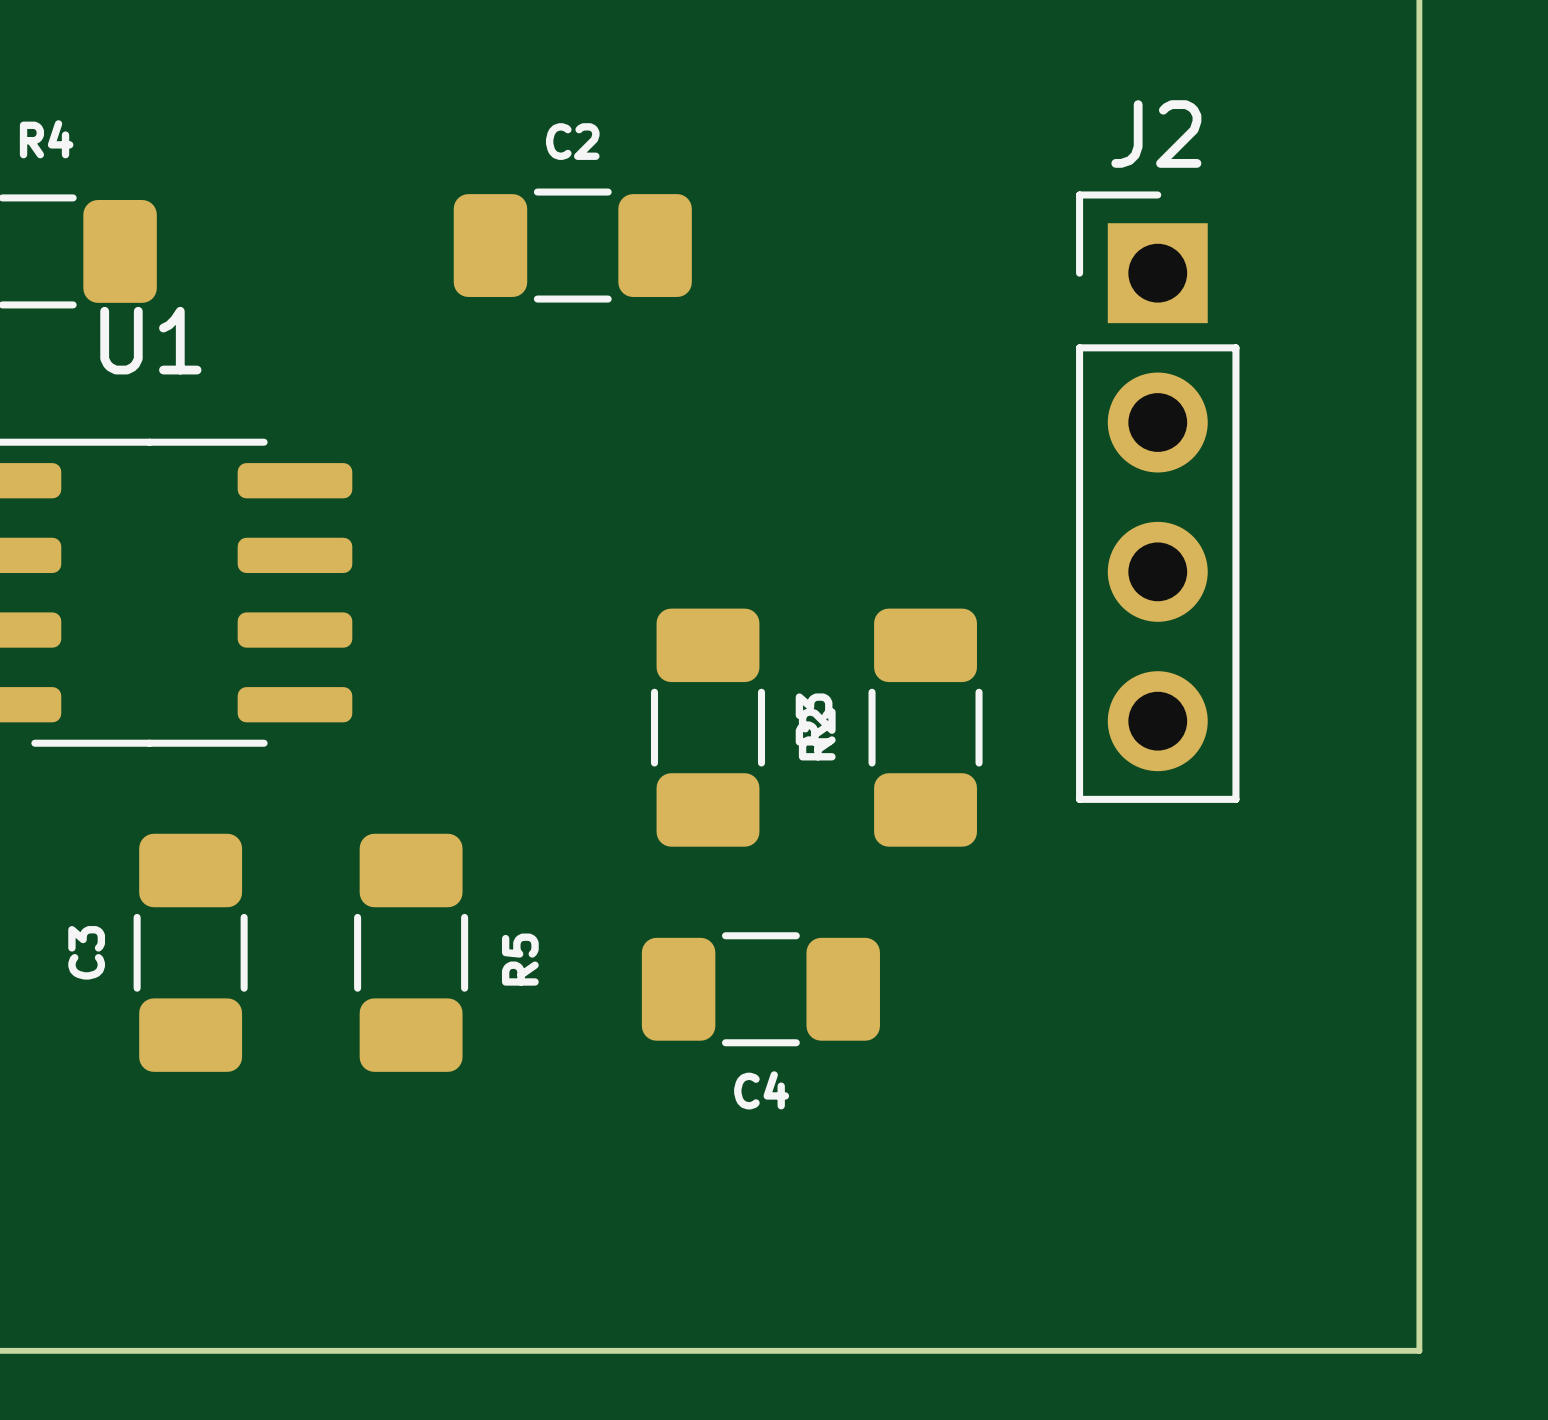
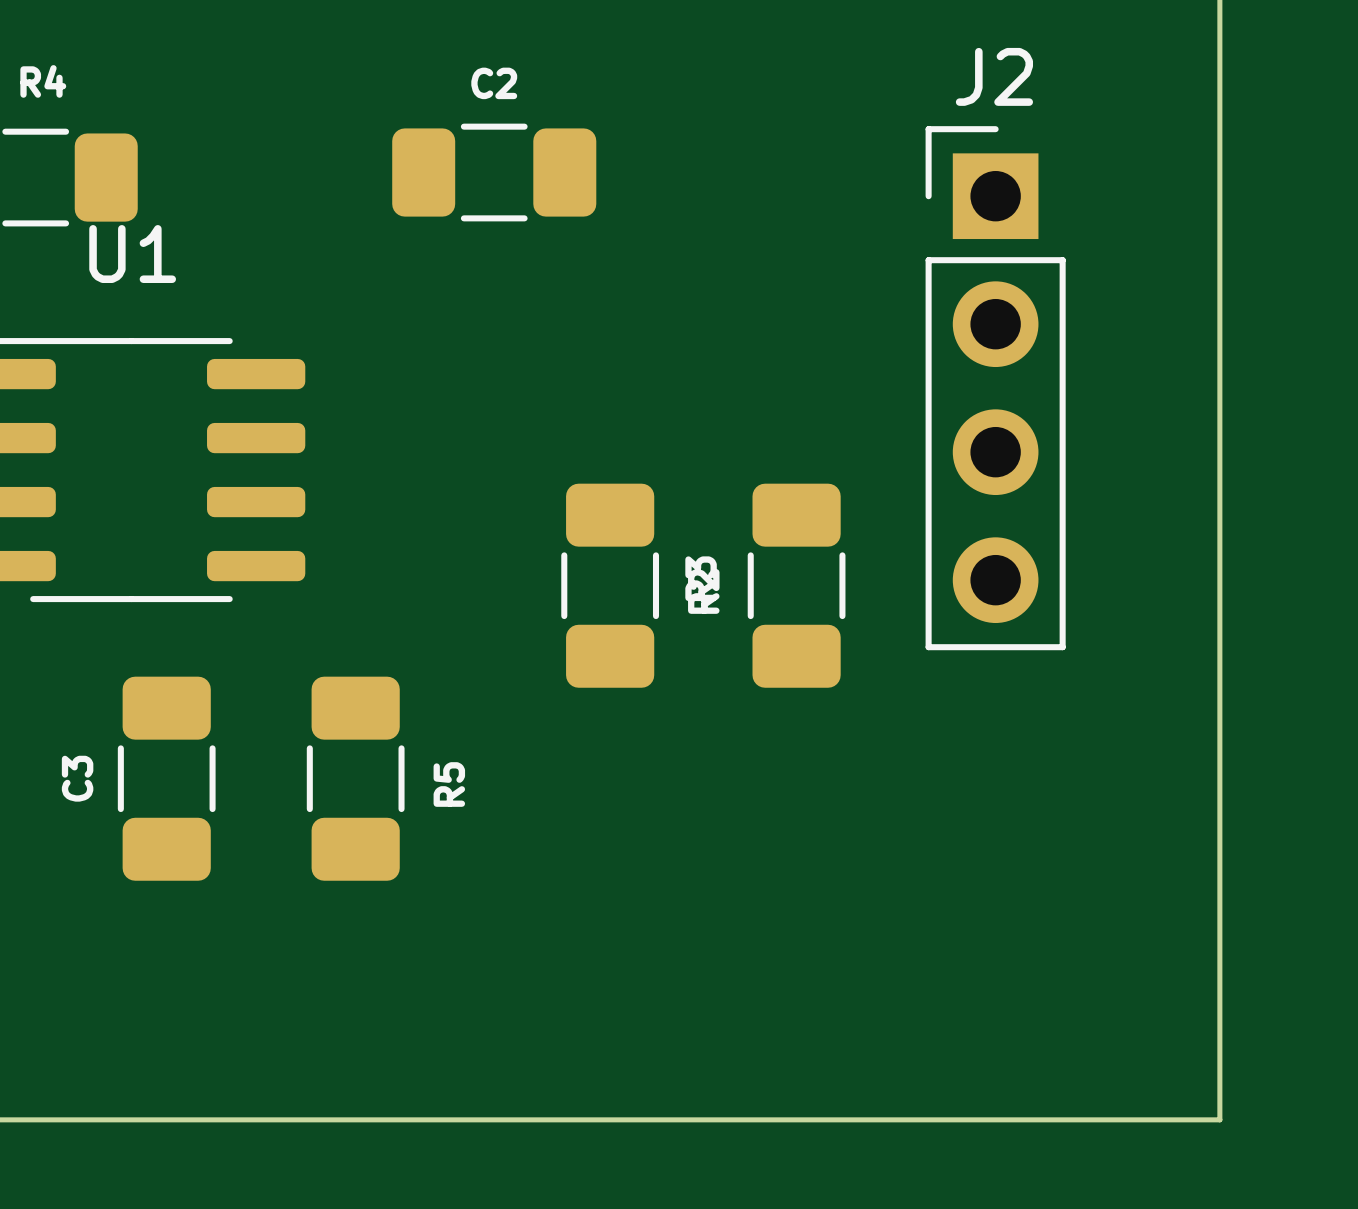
C4: (760, 989) -> none

